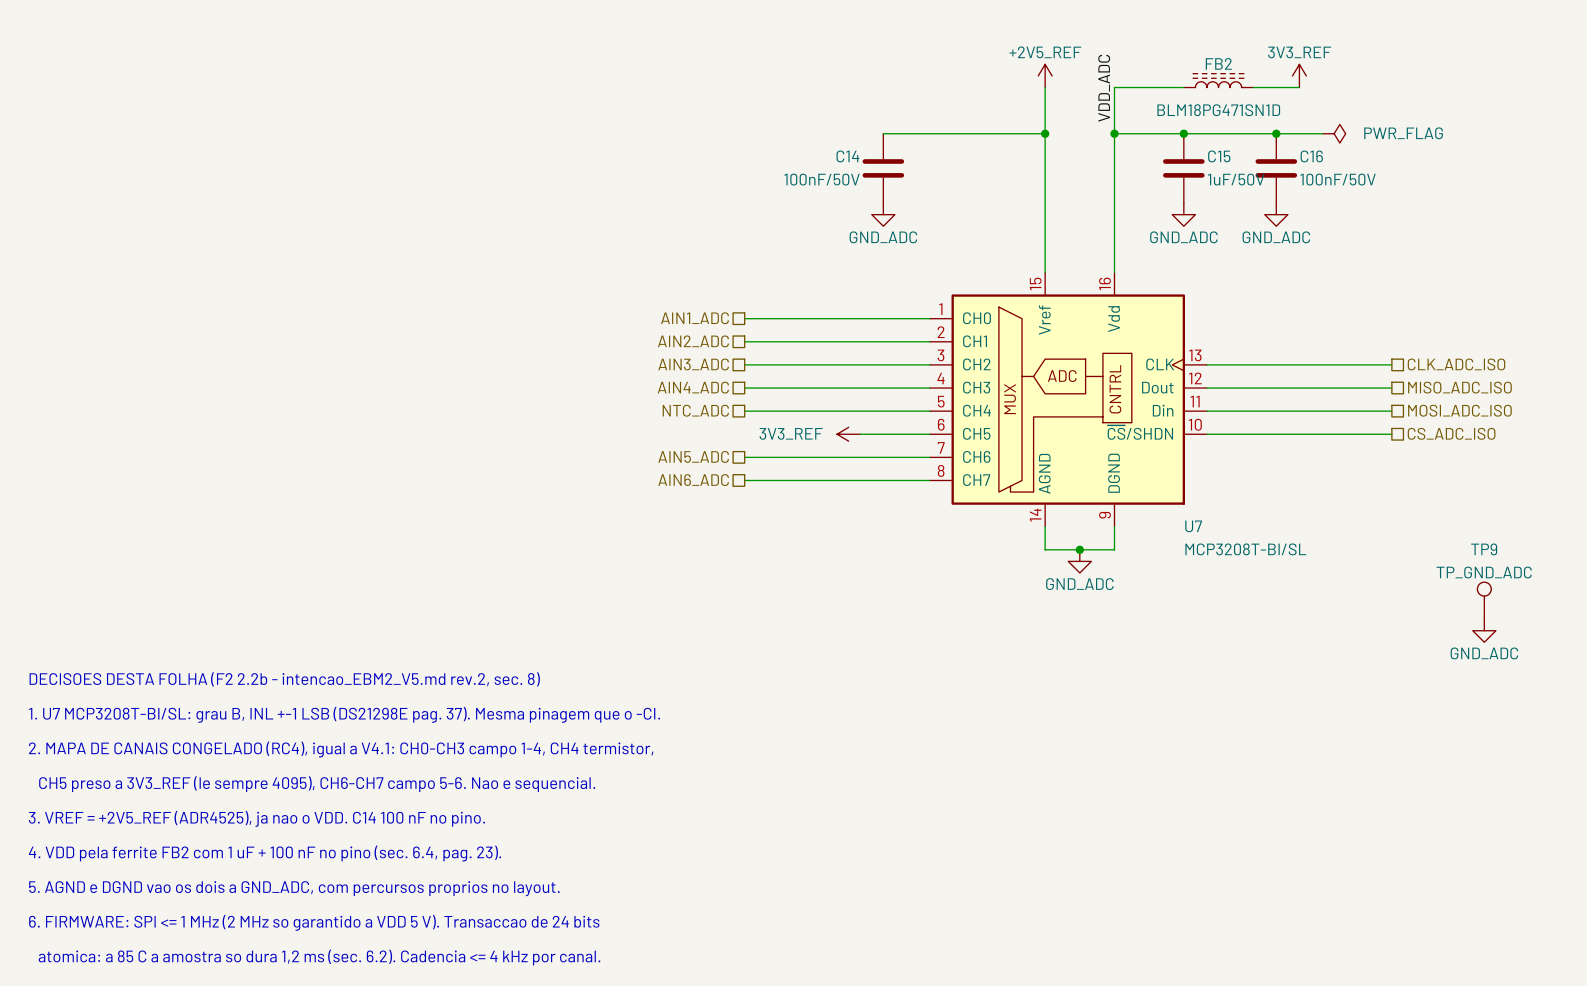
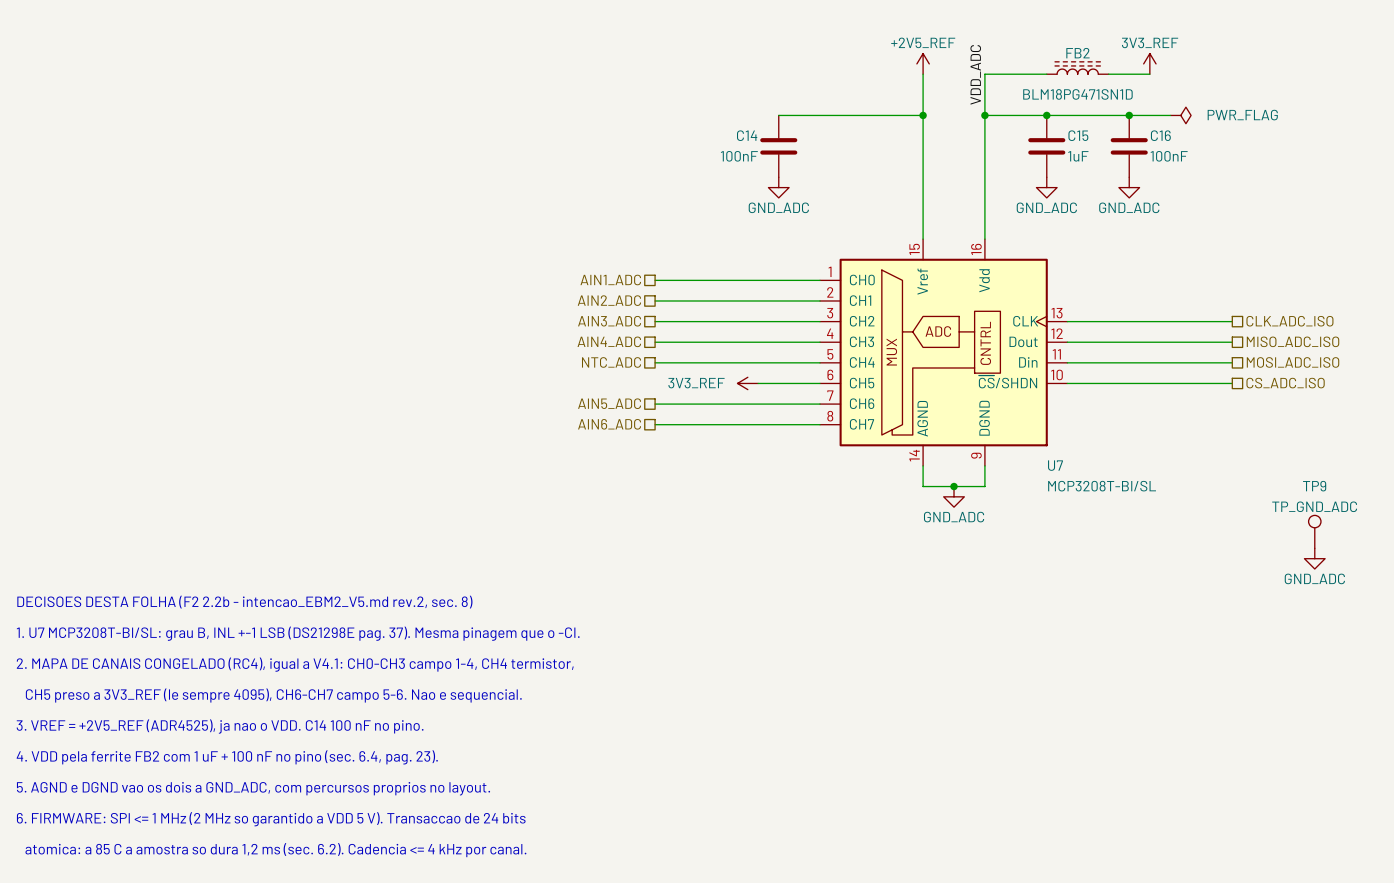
C14 value: 100nF/50V (822, 179) -> 100nF (739, 156)
C15 value: 1uF/50V (1236, 179) -> 1uF (1078, 156)
C16 value: 100nF/50V (1338, 179) -> 100nF (1169, 156)

